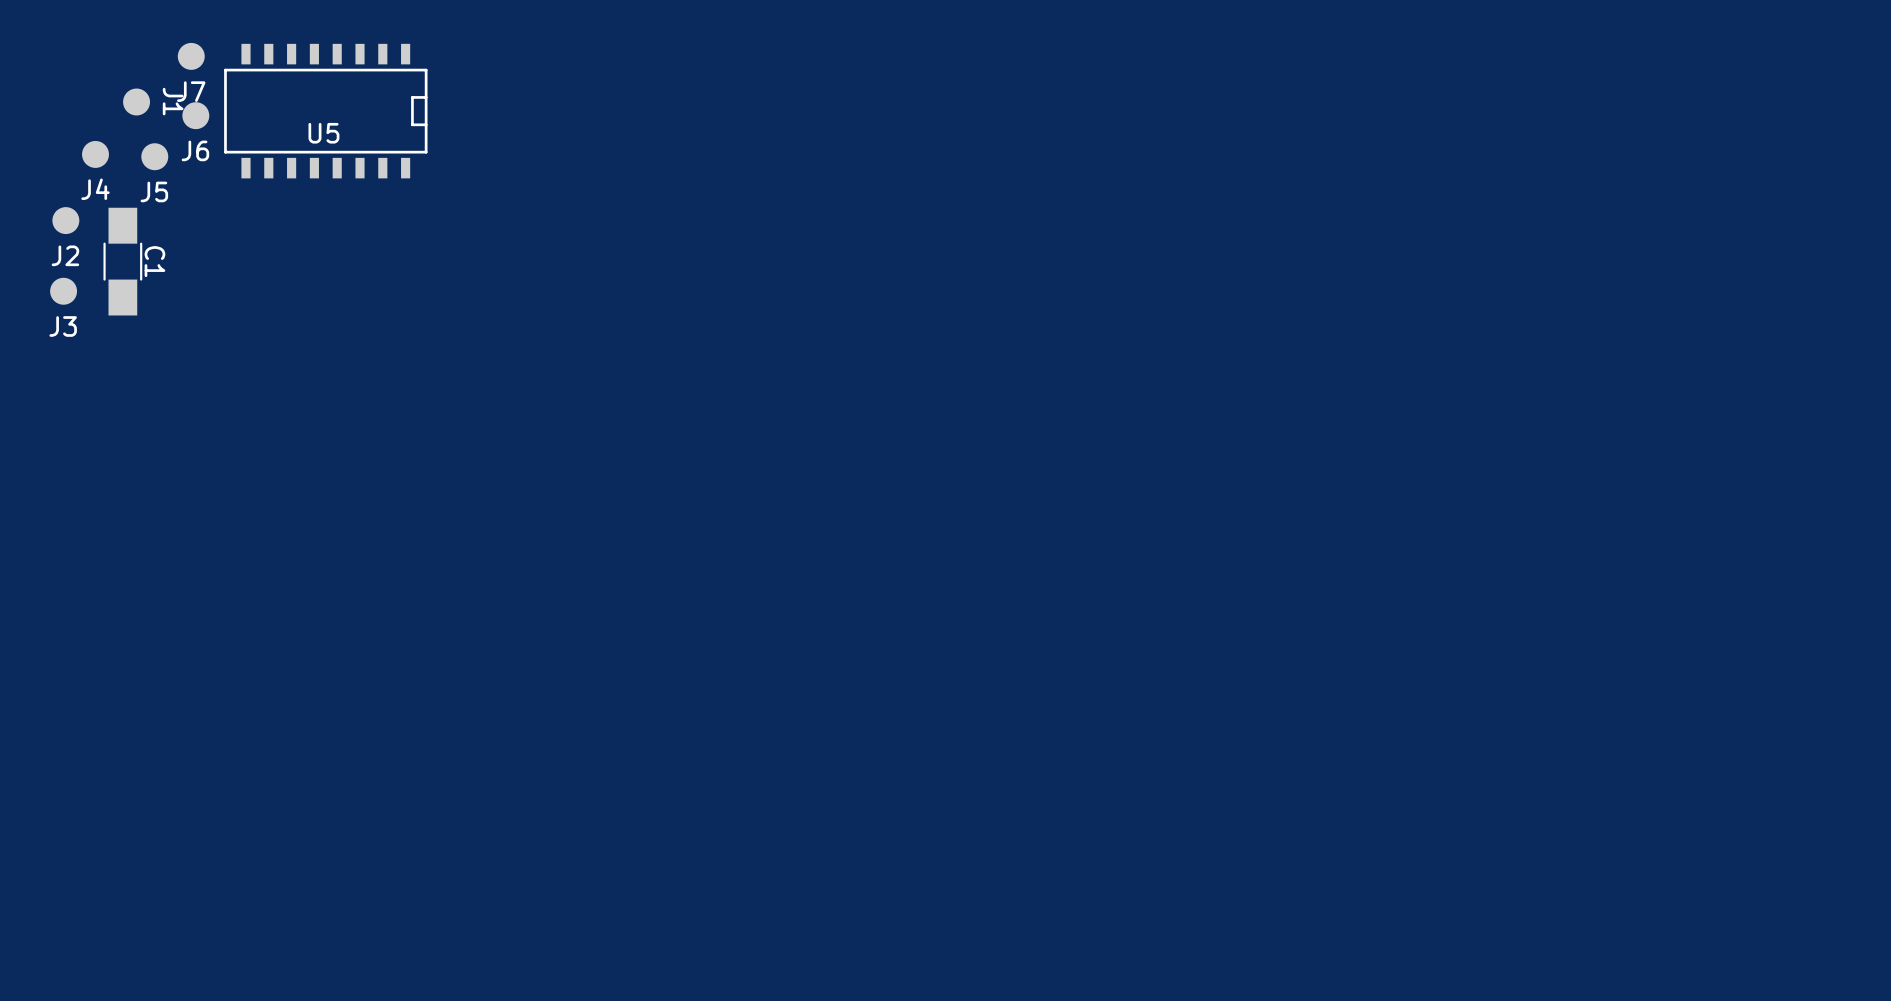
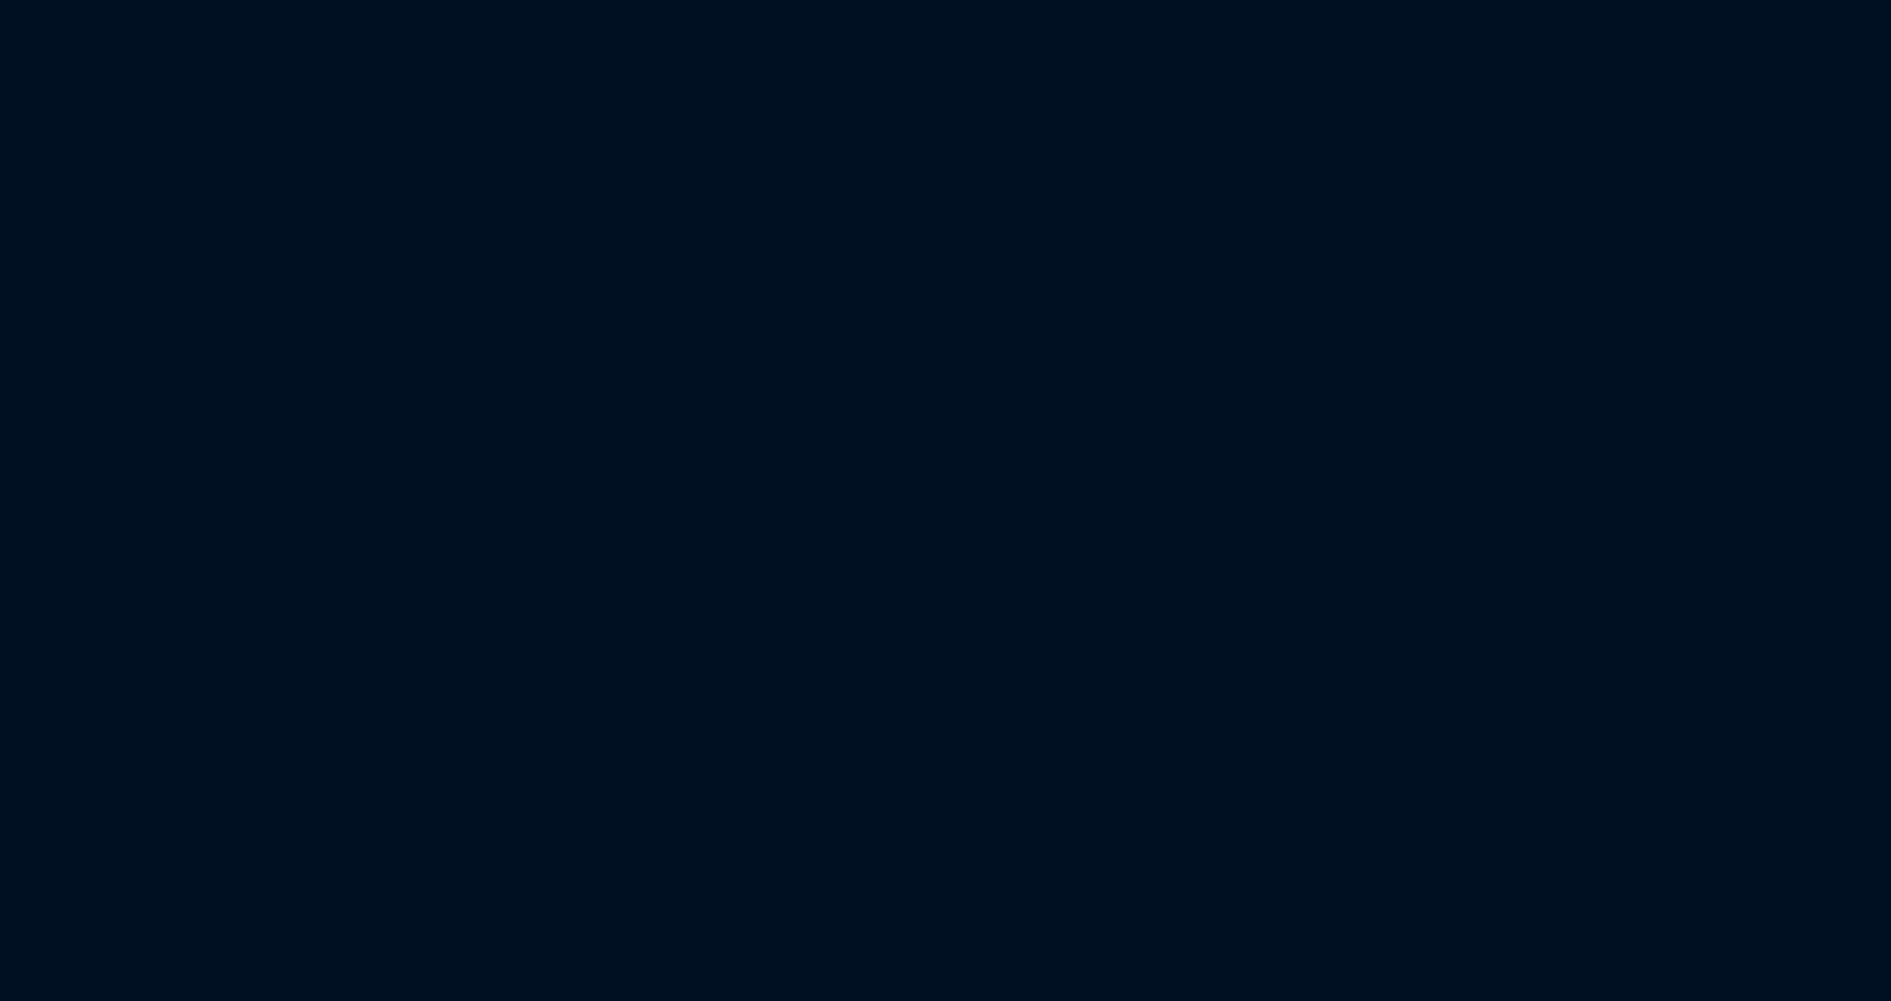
J7: (191, 56) -> none
J1: (136, 102) -> none
U5: (325, 111) -> none
J6: (195, 115) -> none
J4: (95, 154) -> none
J5: (154, 156) -> none
J2: (65, 220) -> none
C1: (122, 261) -> none
J3: (63, 291) -> none

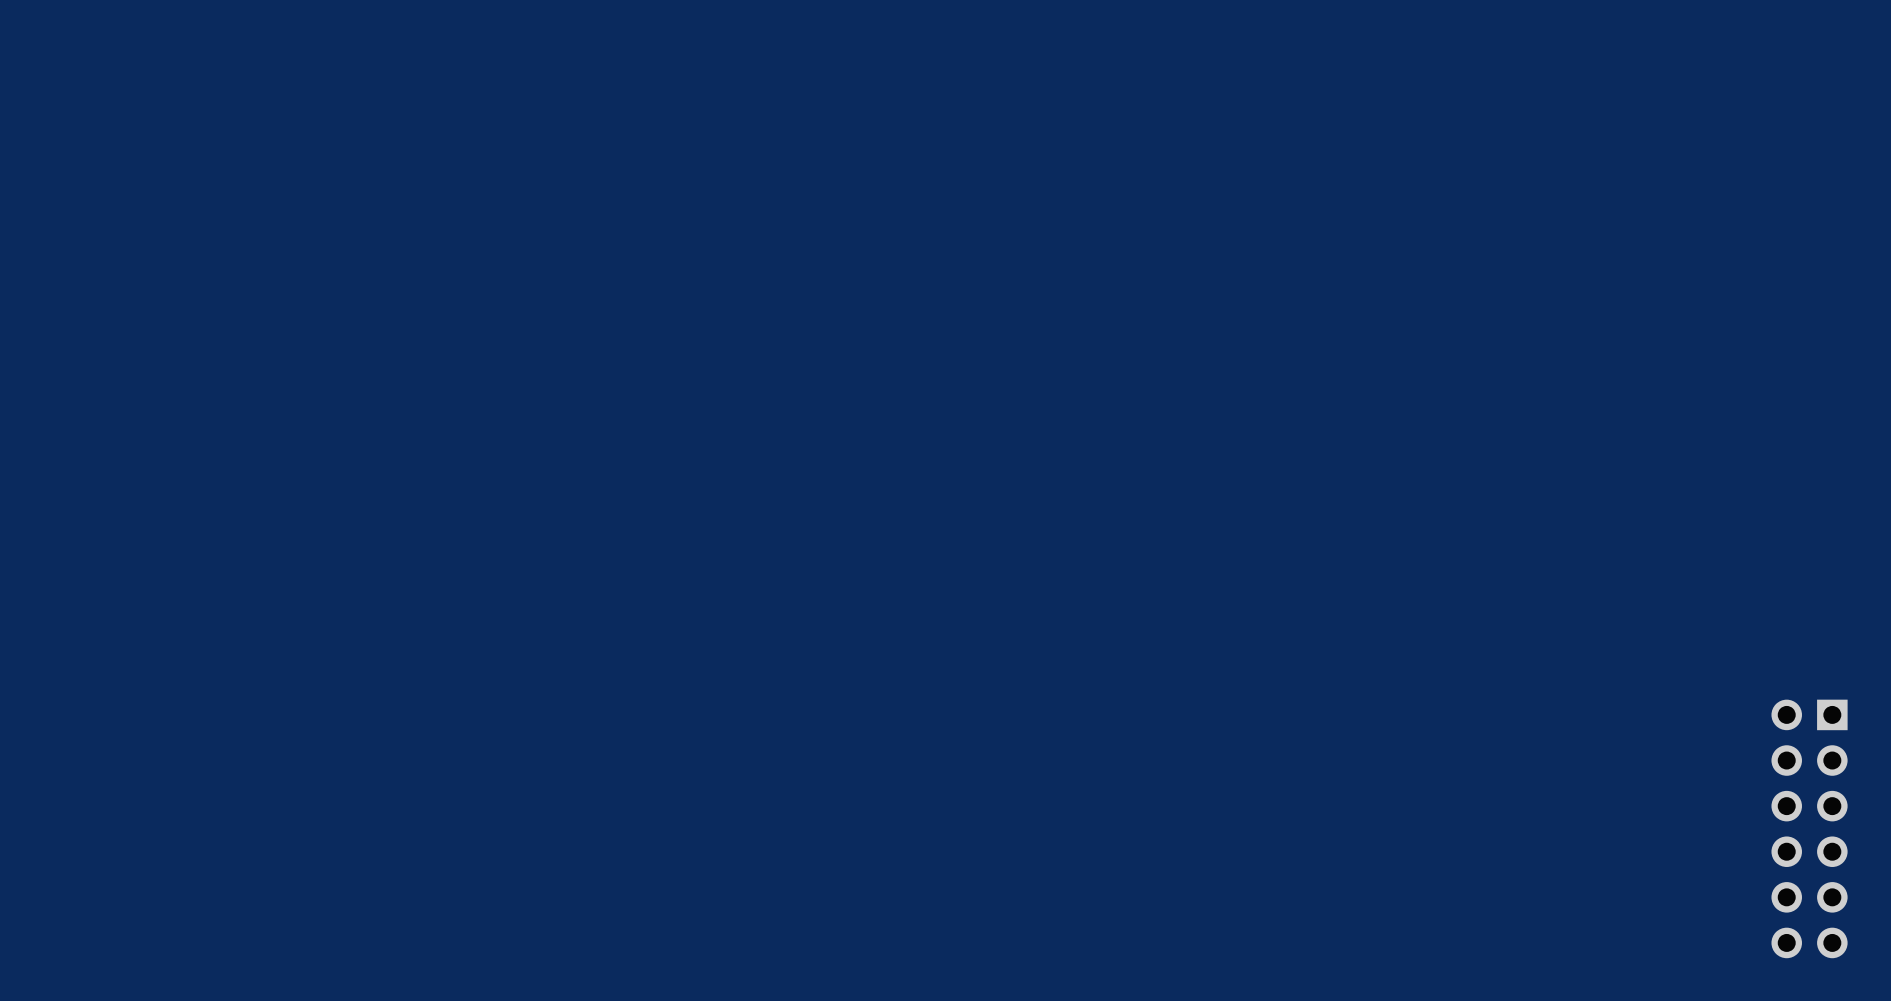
part: none -> (1809, 828)

